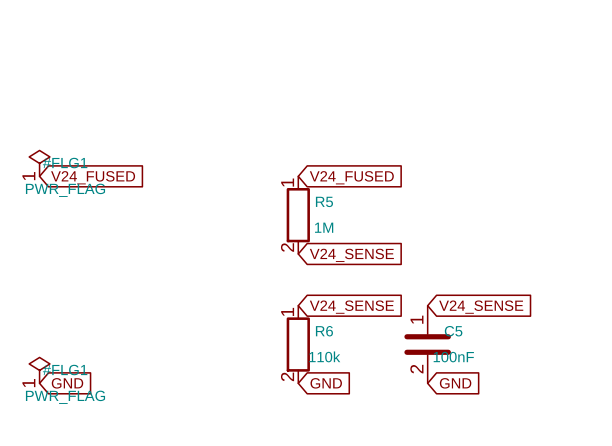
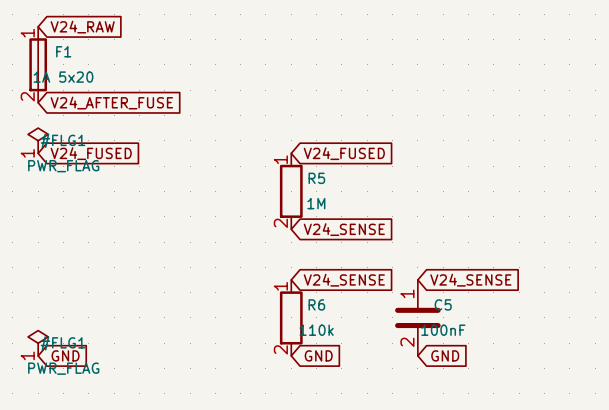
global label: none -> V24_RAW (82, 27)
F1: none -> 1A 5x20 (38, 64)
global label: none -> V24_AFTER_FUSE (111, 103)

